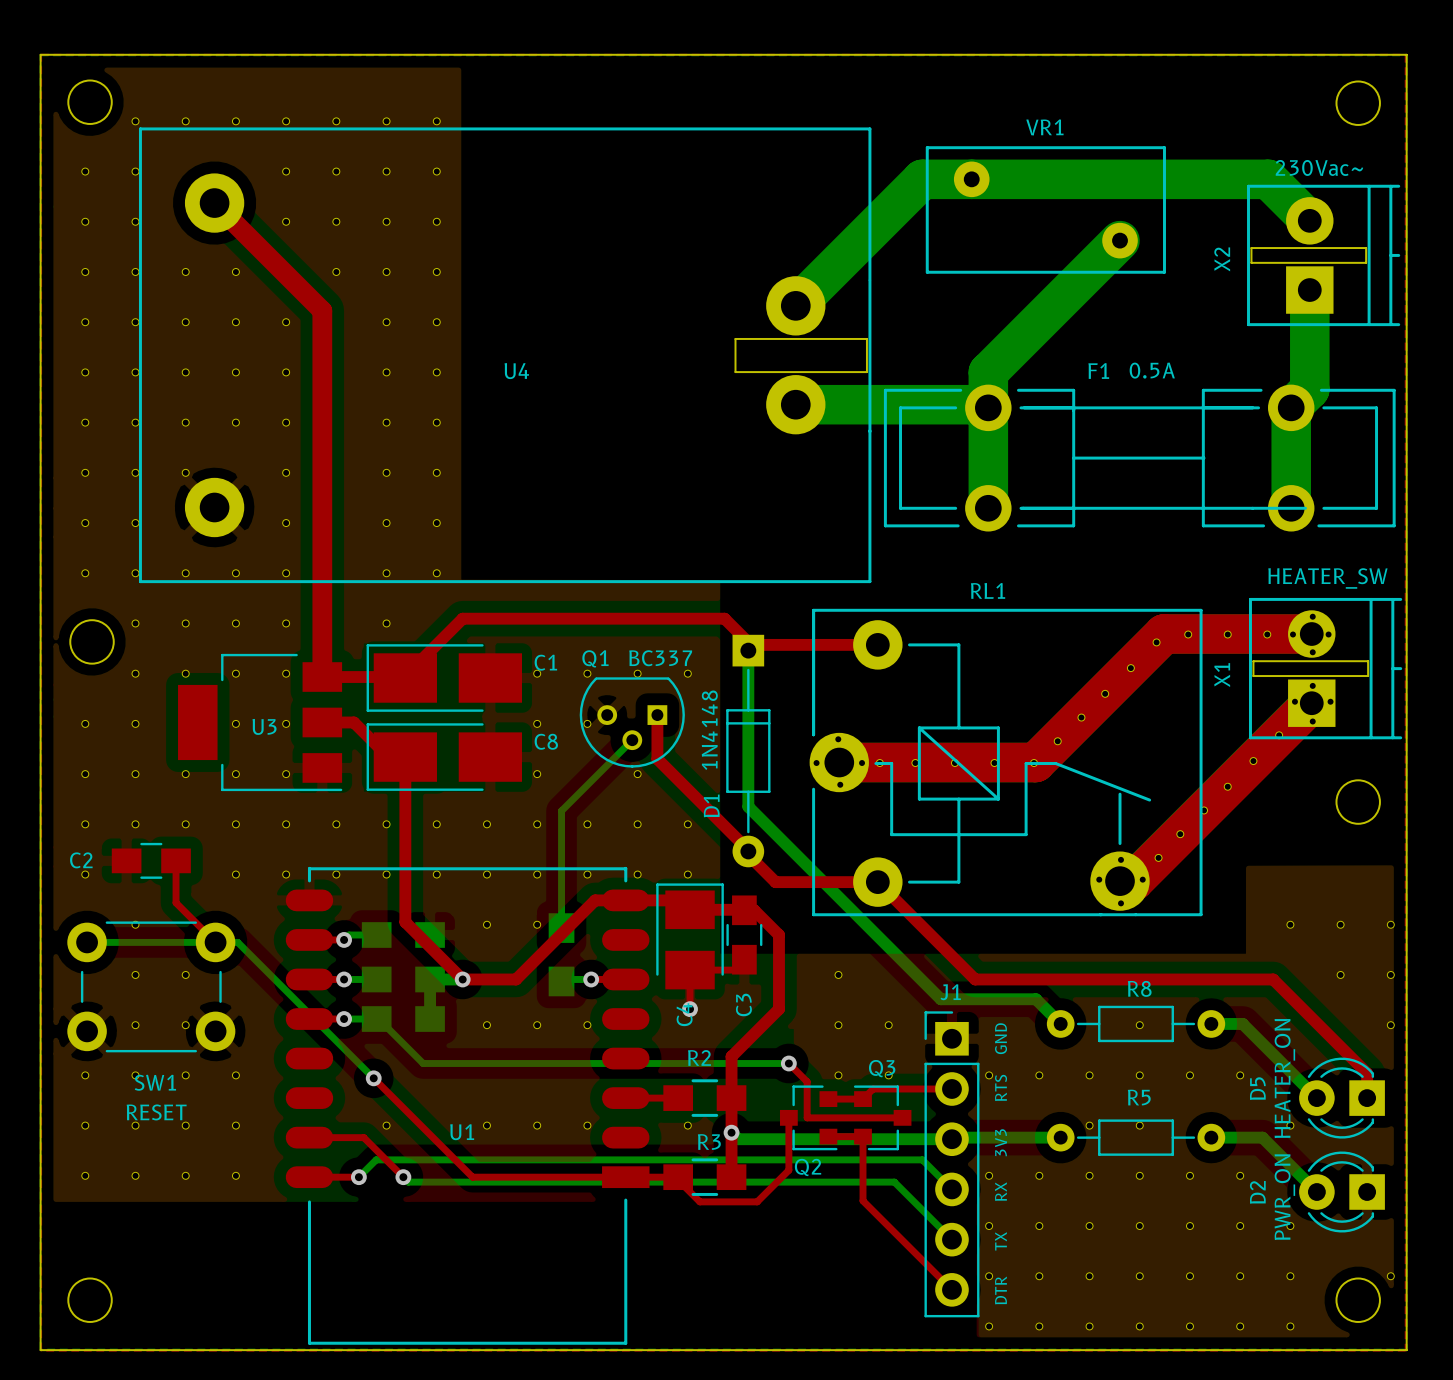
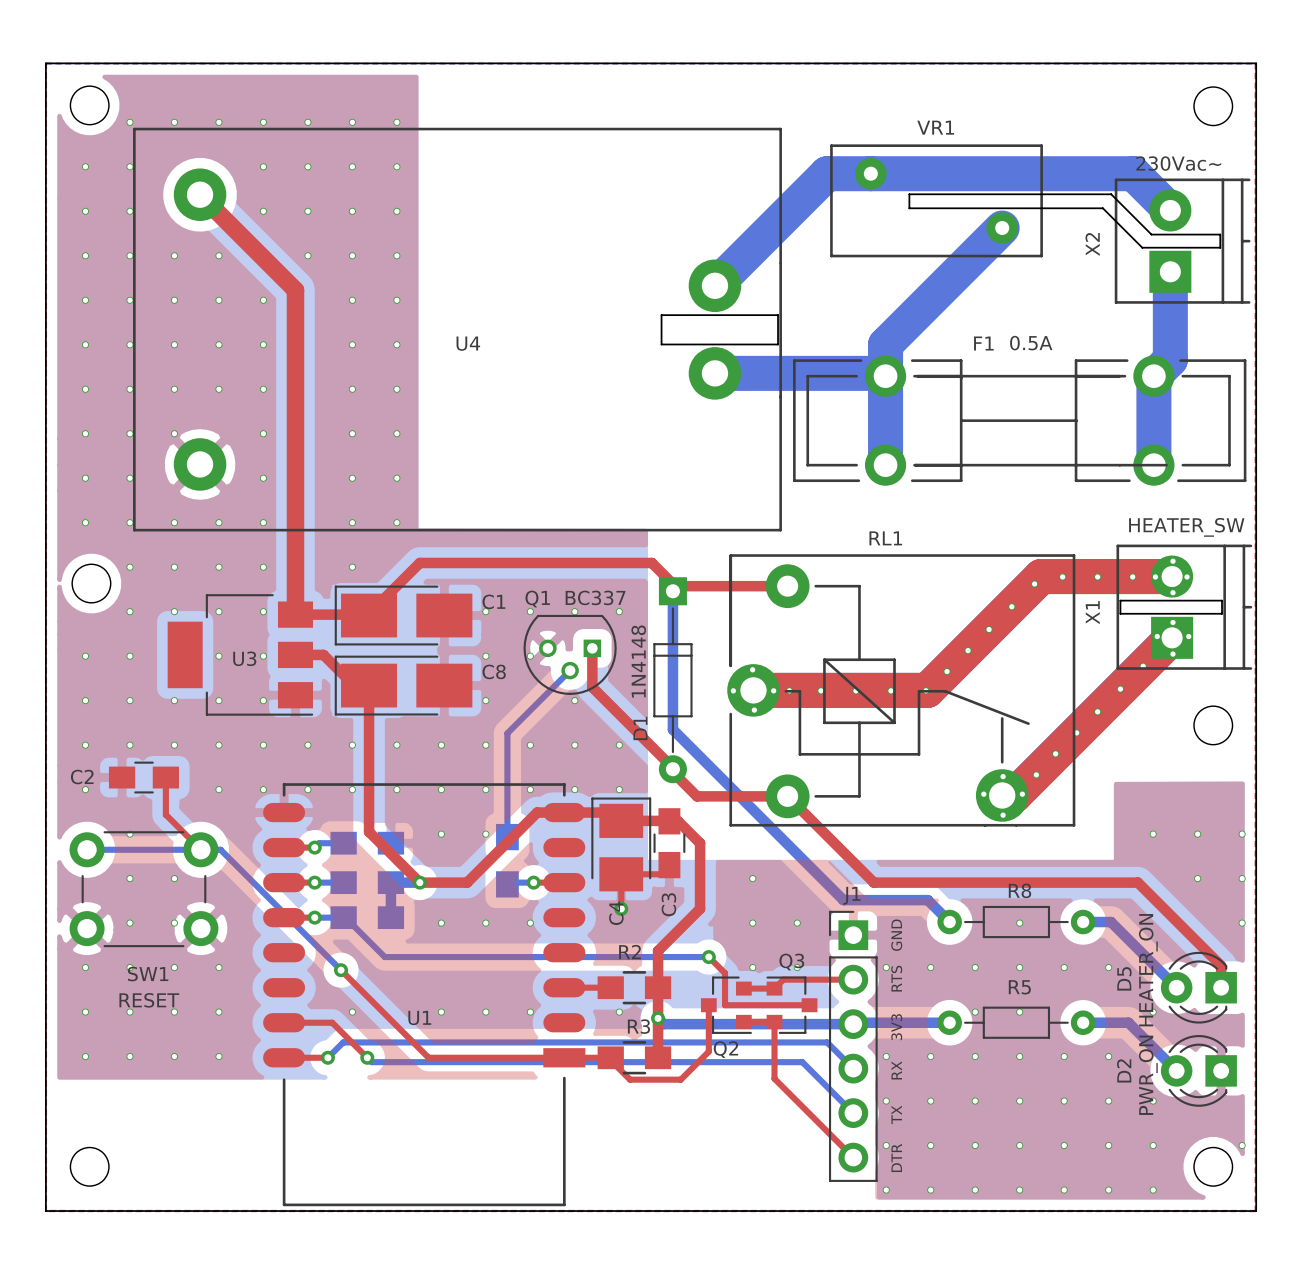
board edge: (1288, 248) (1251, 248) (1251, 262) (1278, 262) -> (1151, 234) (1111, 194) (909, 194) (909, 208) (1102, 208) (1142, 247)

